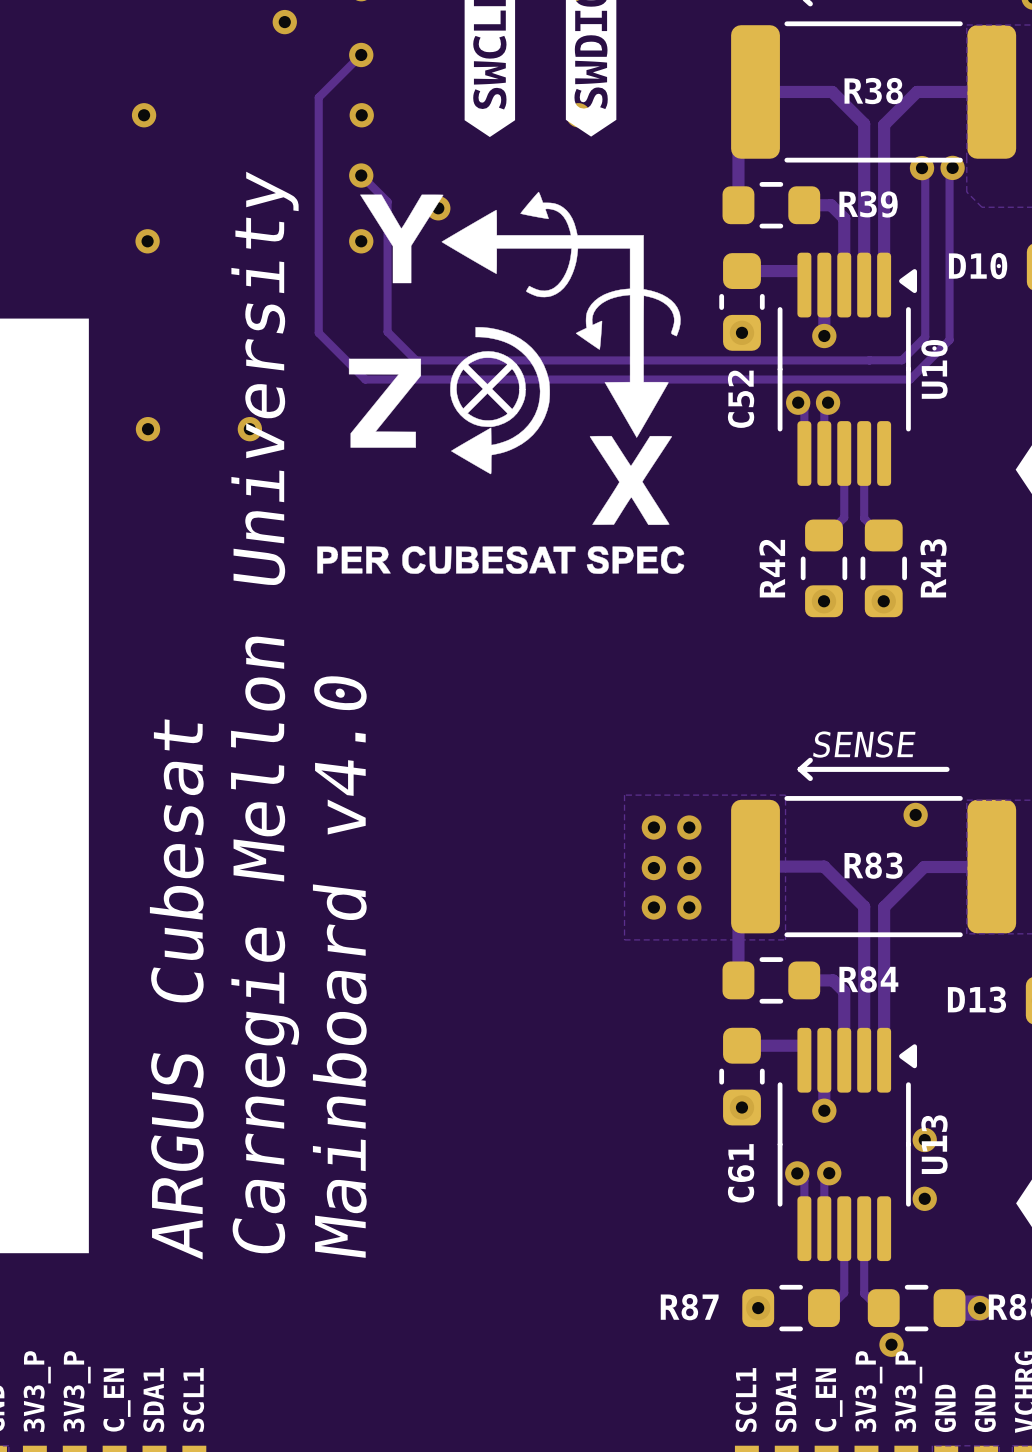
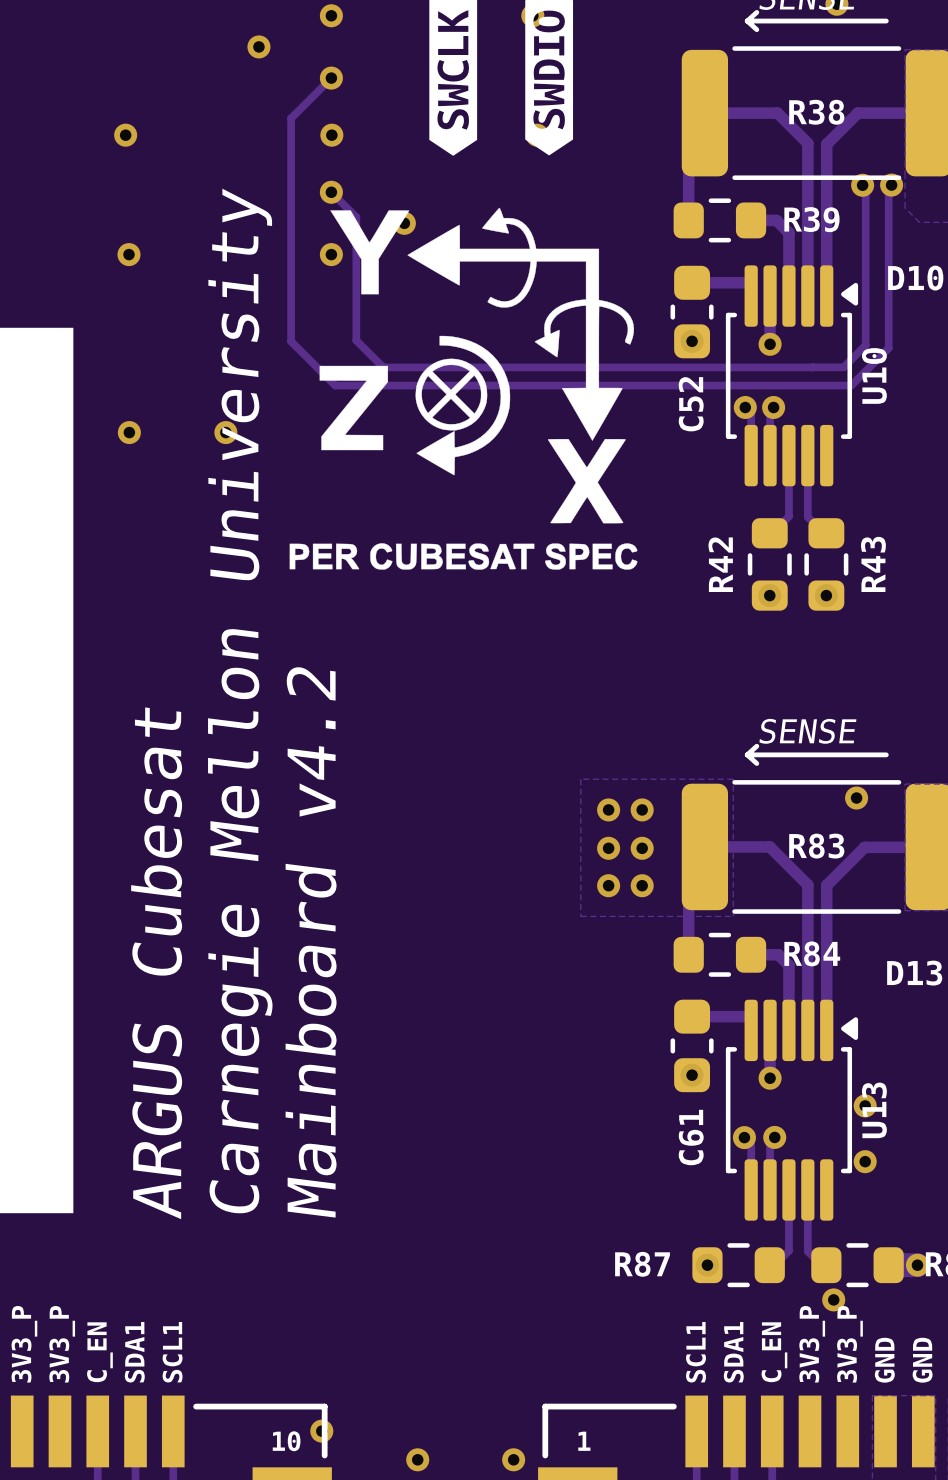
U10 footprint: [777, 252, 918, 486] -> [725, 265, 859, 487]
text: Mainboard v4.0 (339, 966) -> Mainboard v4.2 (311, 942)
U13 footprint: [777, 1027, 918, 1262] -> [725, 999, 859, 1221]

